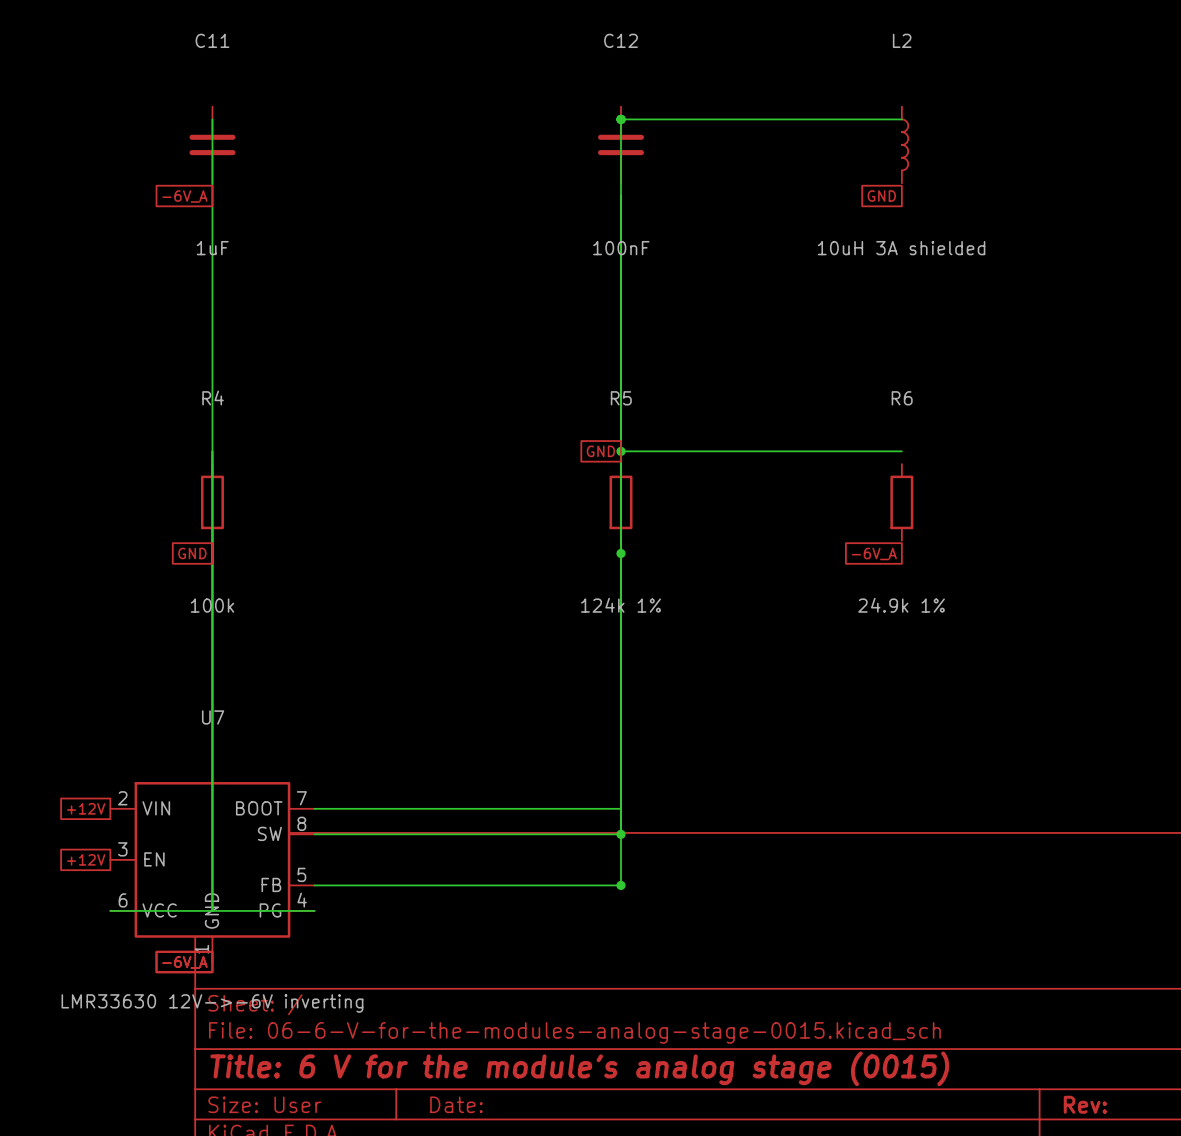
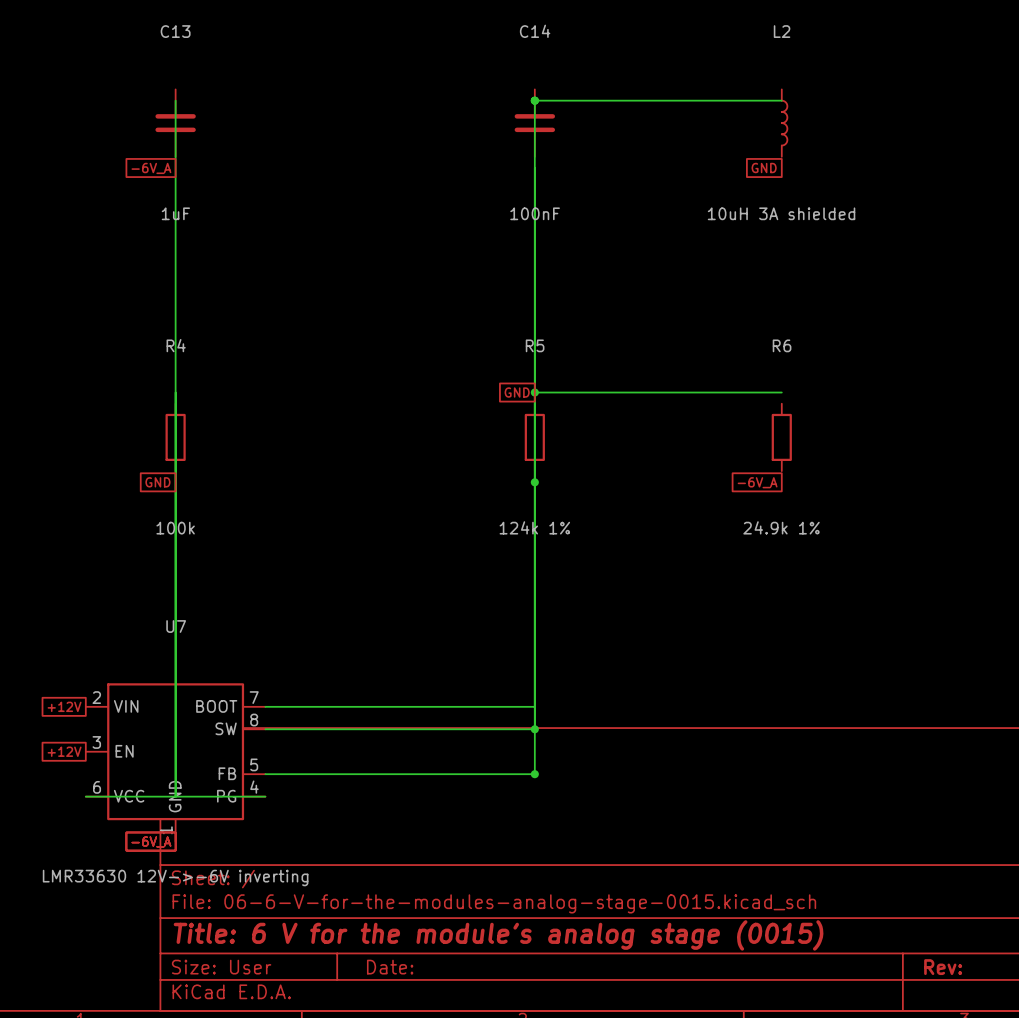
C11 name: C11 (212, 40) -> C13 (175, 31)
C12 name: C12 (621, 40) -> C14 (535, 31)

